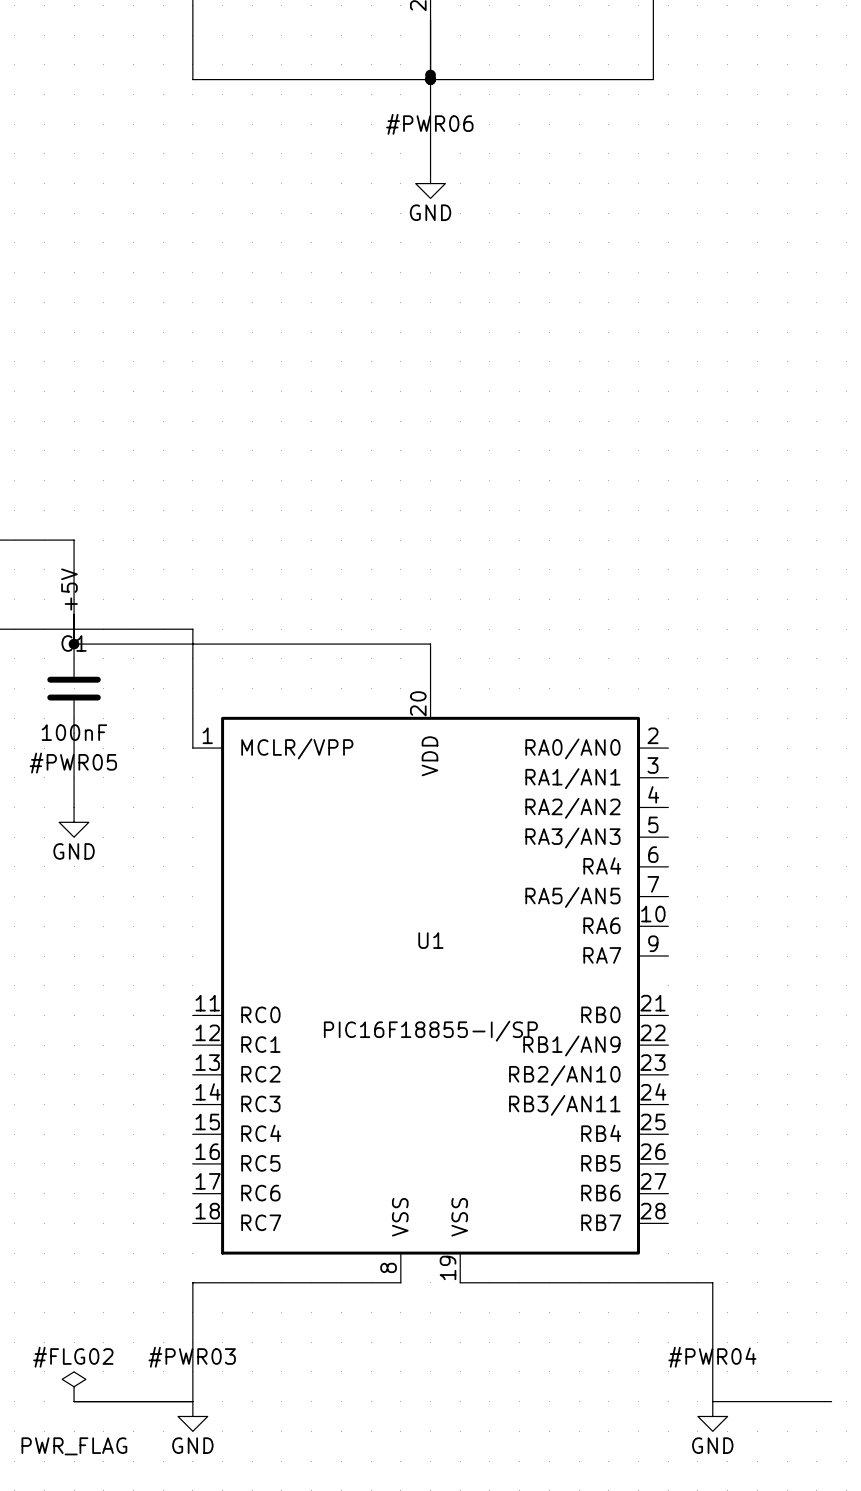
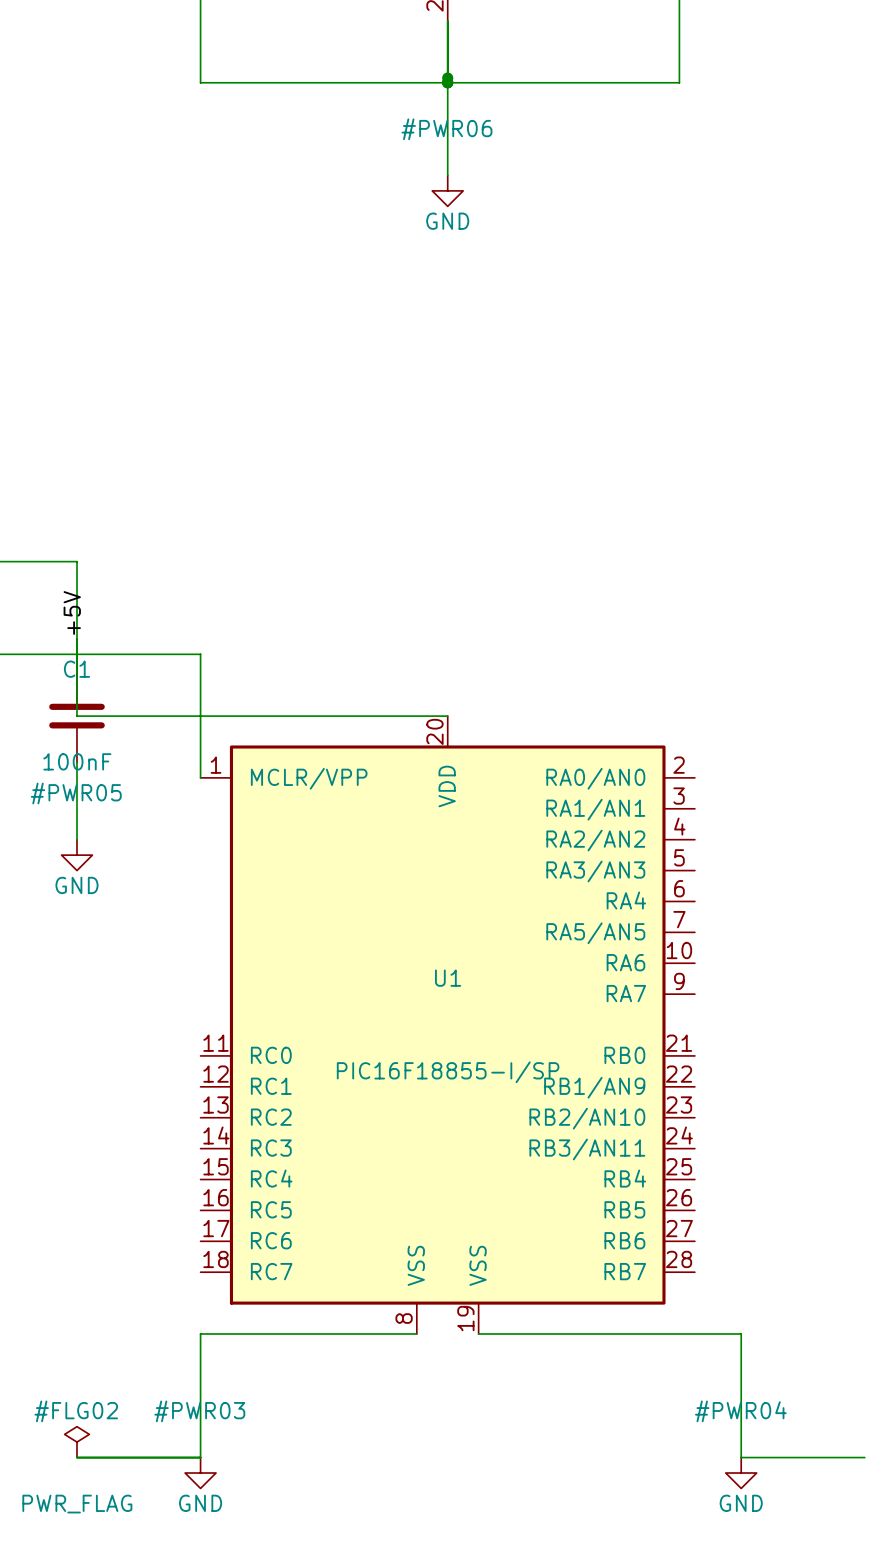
wire: (74, 644) (430, 644) (430, 688) -> (76, 669) (76, 716) (447, 716)
junction: (74, 644) -> none

